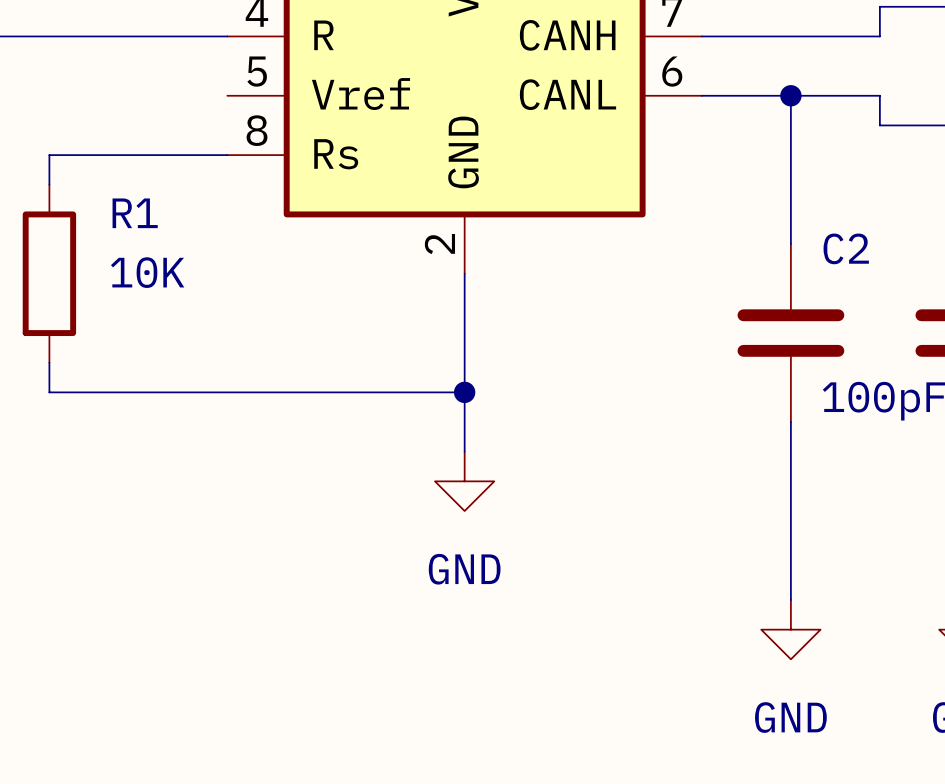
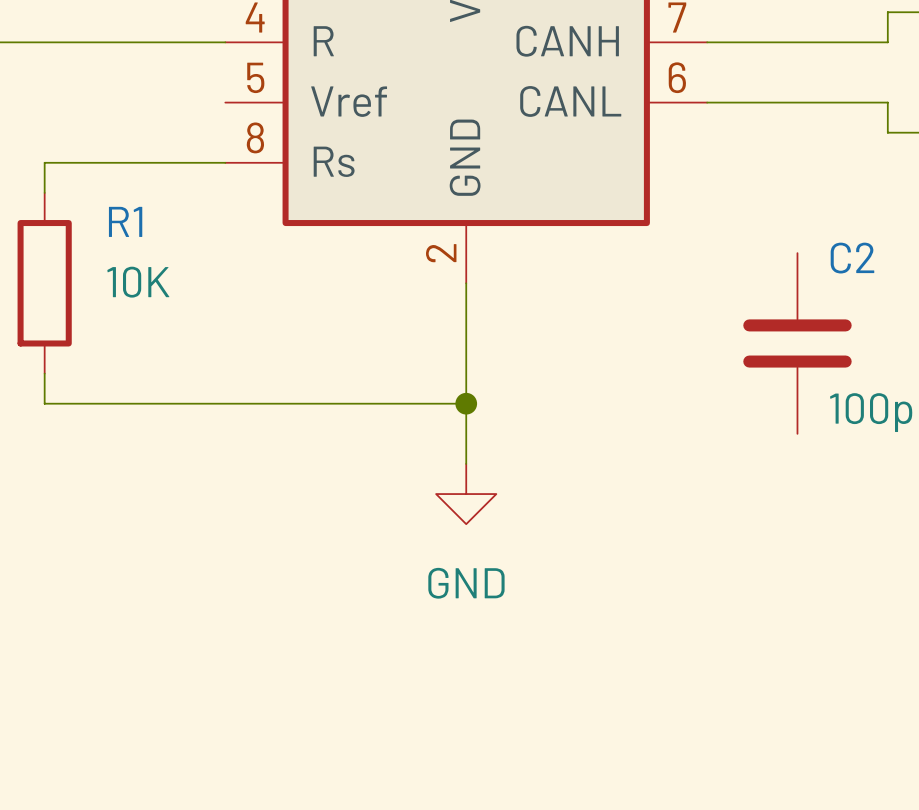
wire: (790, 95) (790, 244) -> none
junction: (790, 95) -> none
wire: (790, 422) (790, 600) -> none
power symbol: GND (790, 629) -> none

